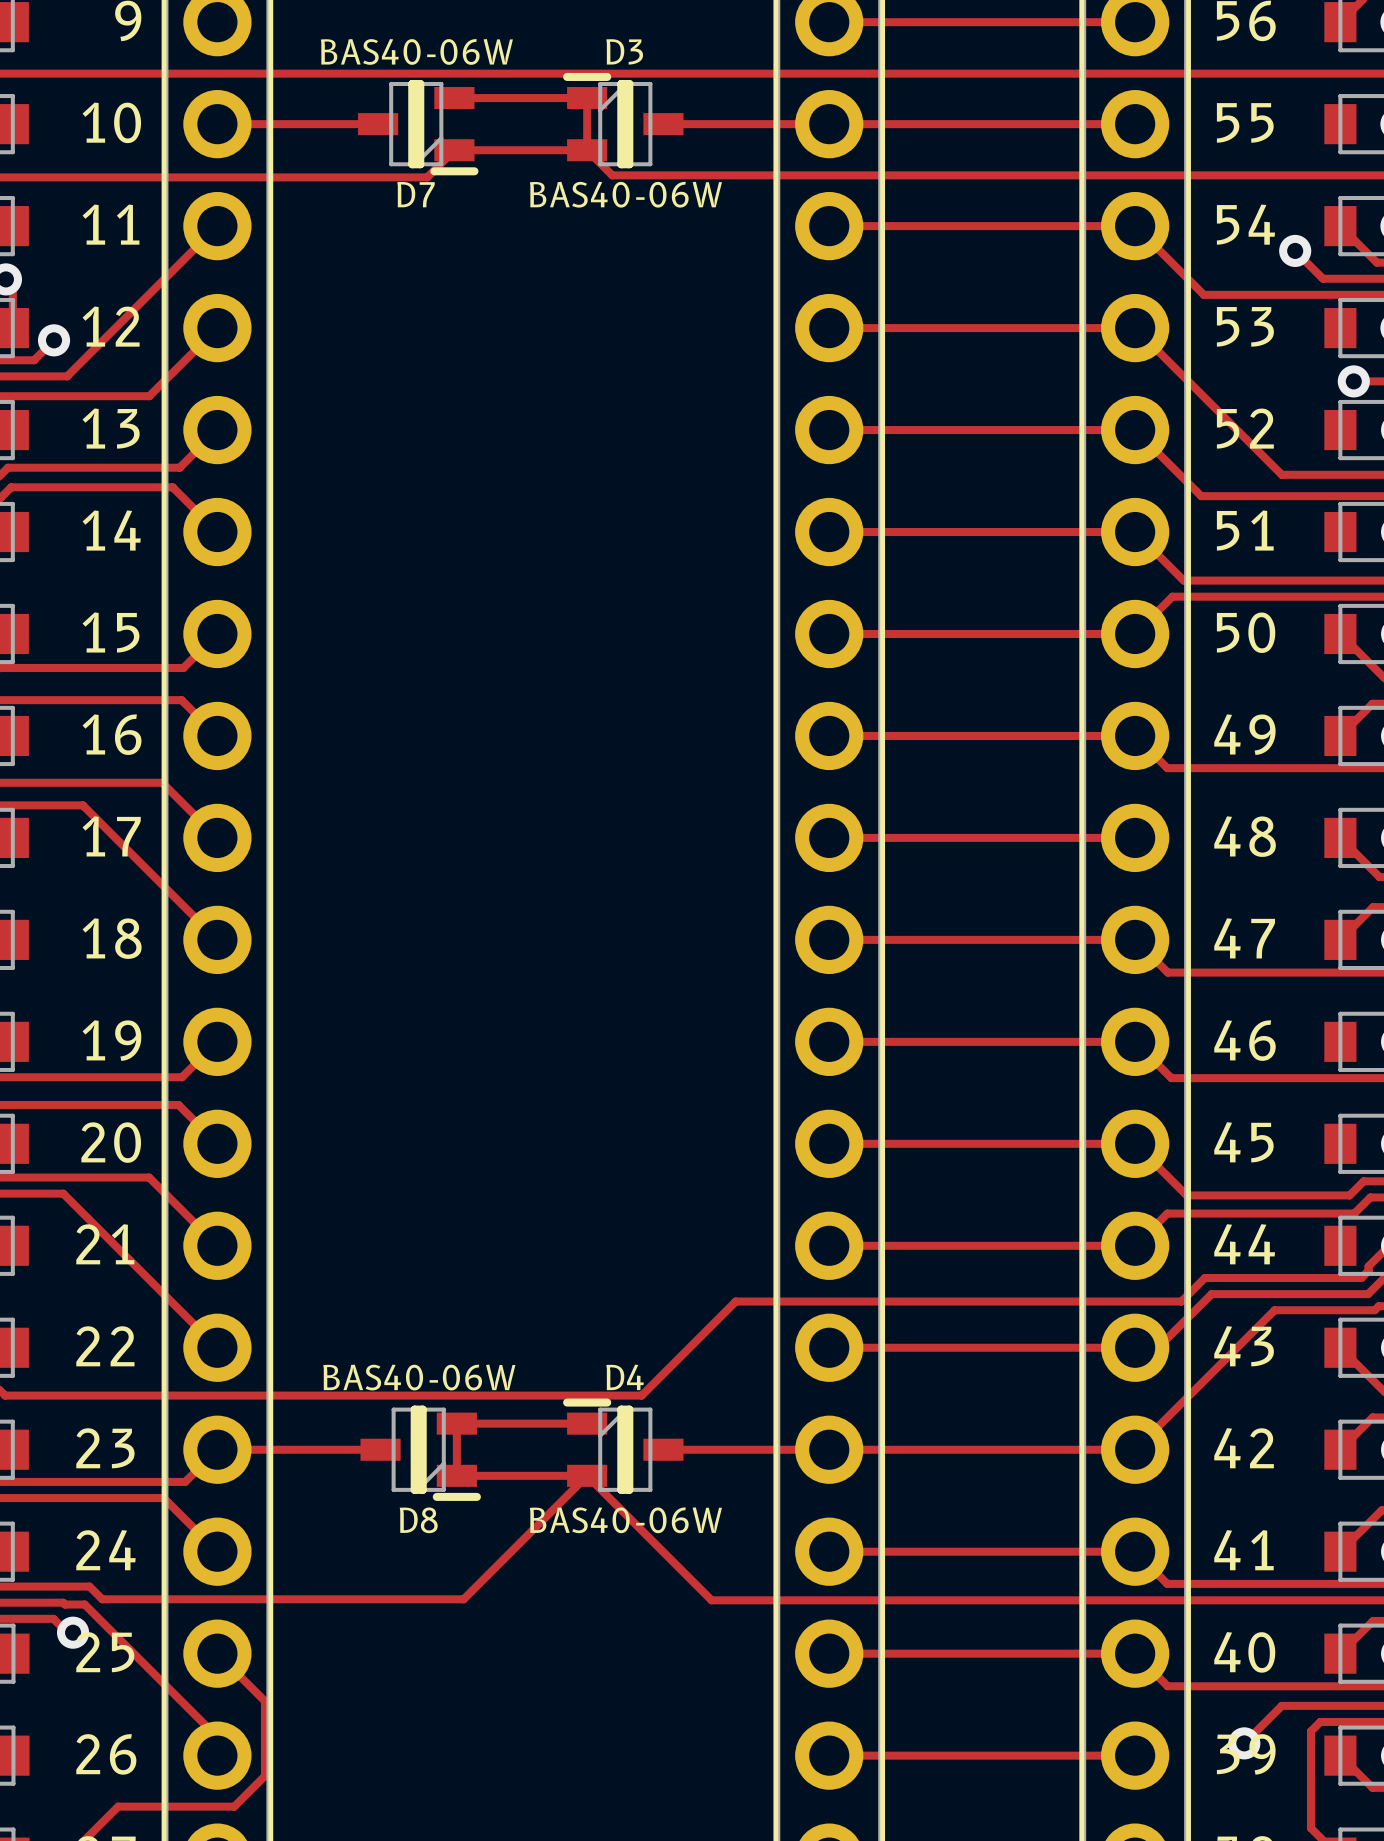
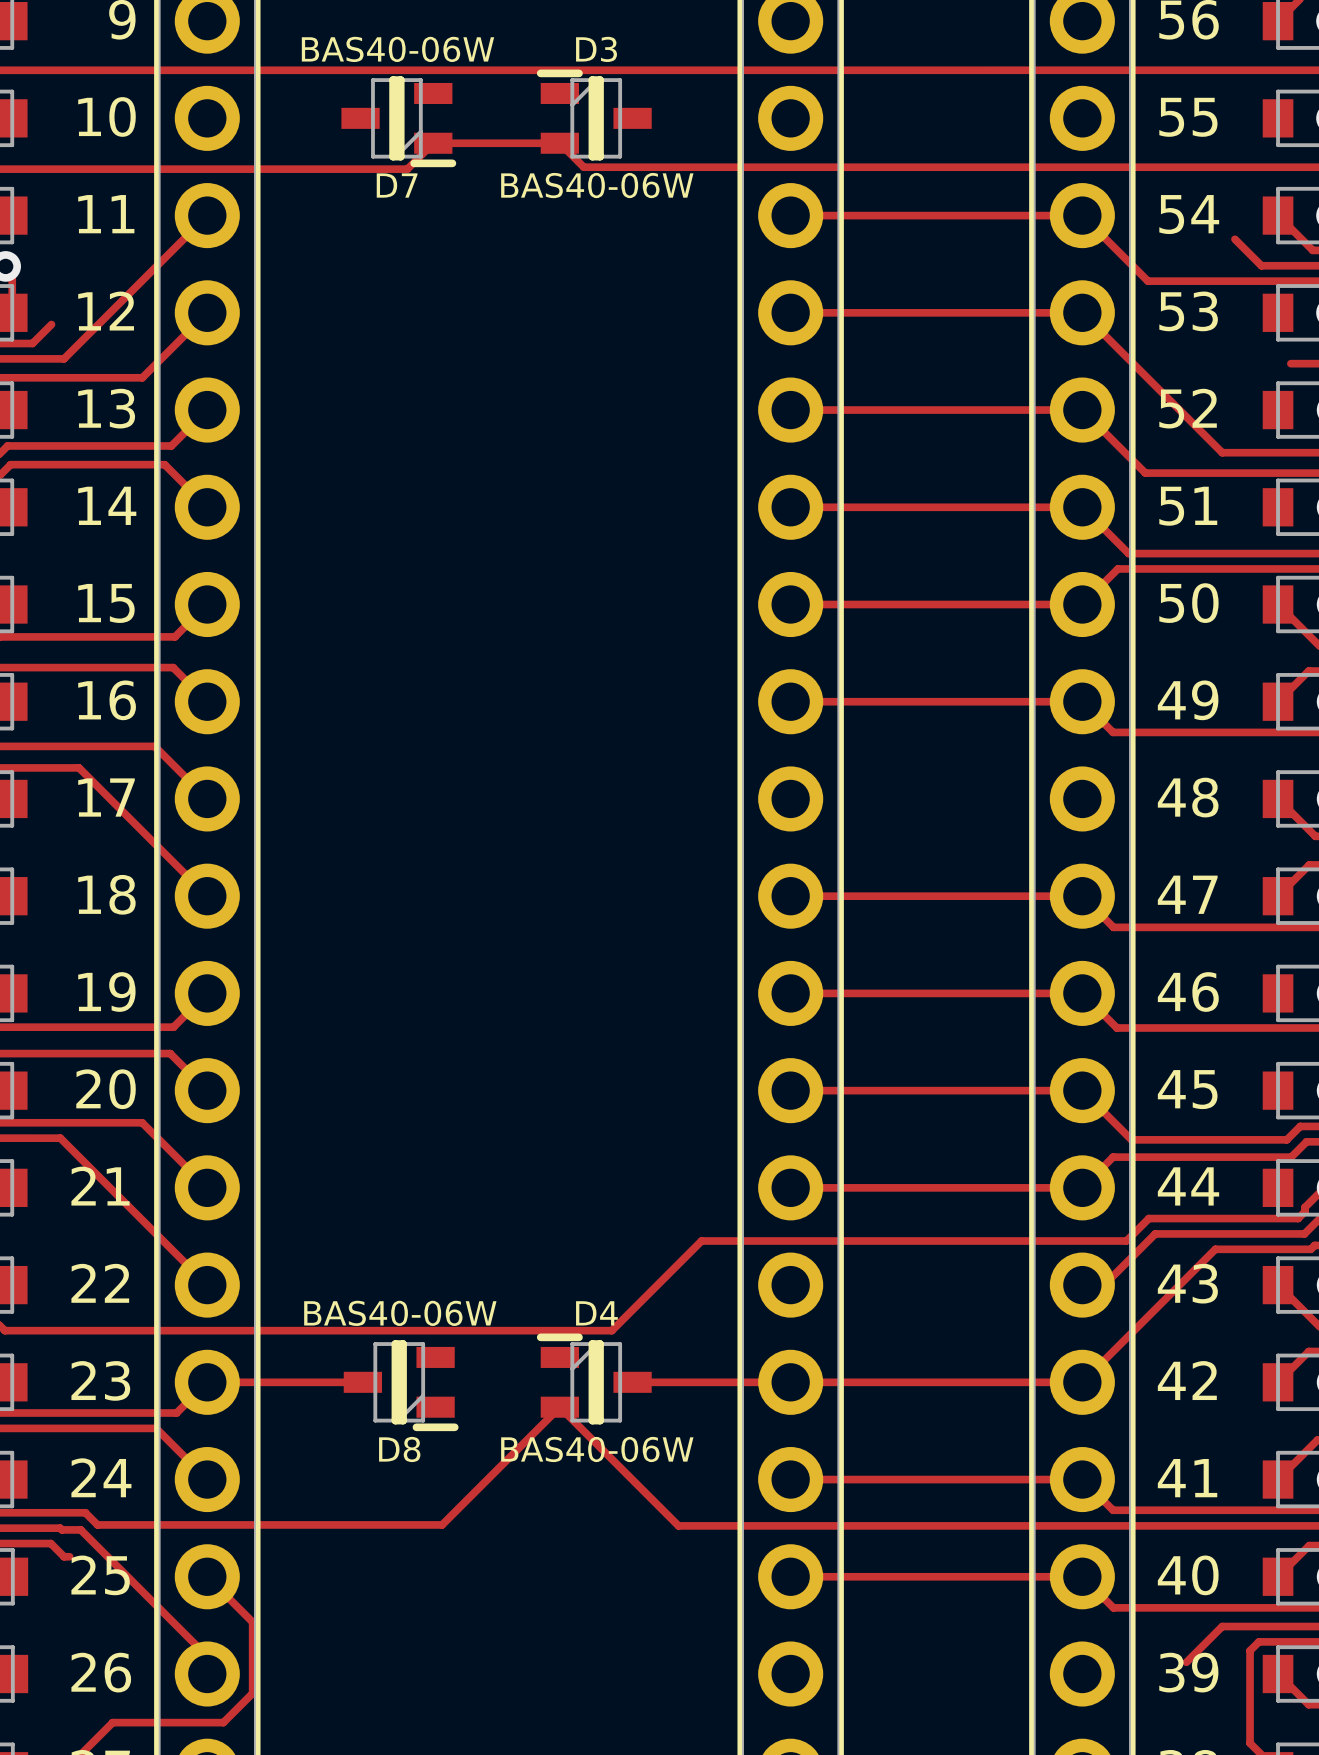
track: (829, 22) (1135, 22) -> none
track: (454, 98) (587, 98) (587, 150) -> none
track: (217, 124) (378, 124) -> none
track: (663, 124) (1135, 124) -> none
via: (1295, 250) -> none
via: (54, 340) -> none
via: (1353, 381) -> none
track: (829, 837) (1135, 837) -> none
track: (829, 1347) (1135, 1347) -> none
track: (587, 1423) (456, 1423) (456, 1475) (587, 1475) -> none
via: (73, 1632) -> none
via: (1244, 1743) -> none
track: (829, 1755) (1135, 1755) -> none

